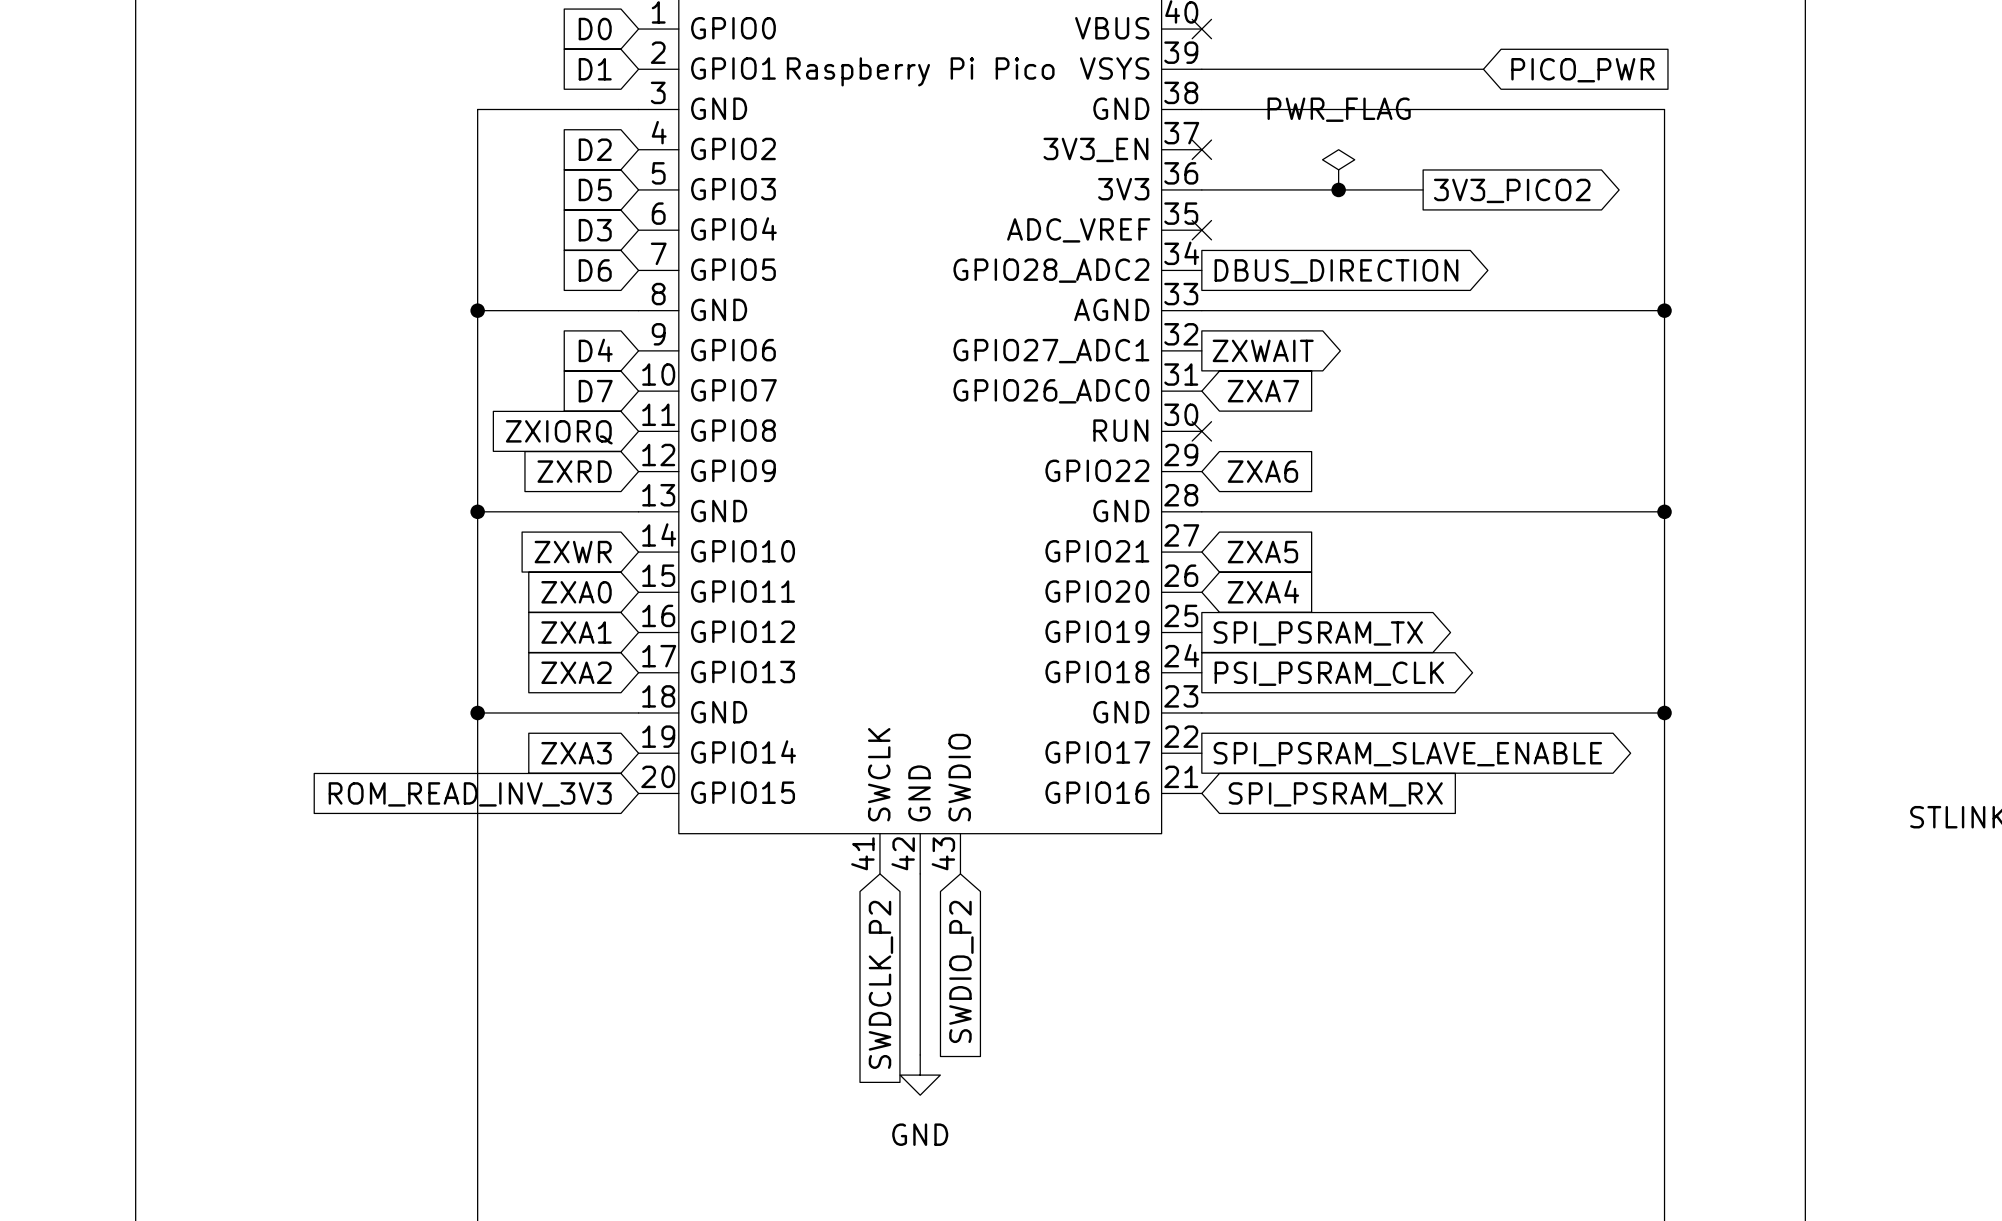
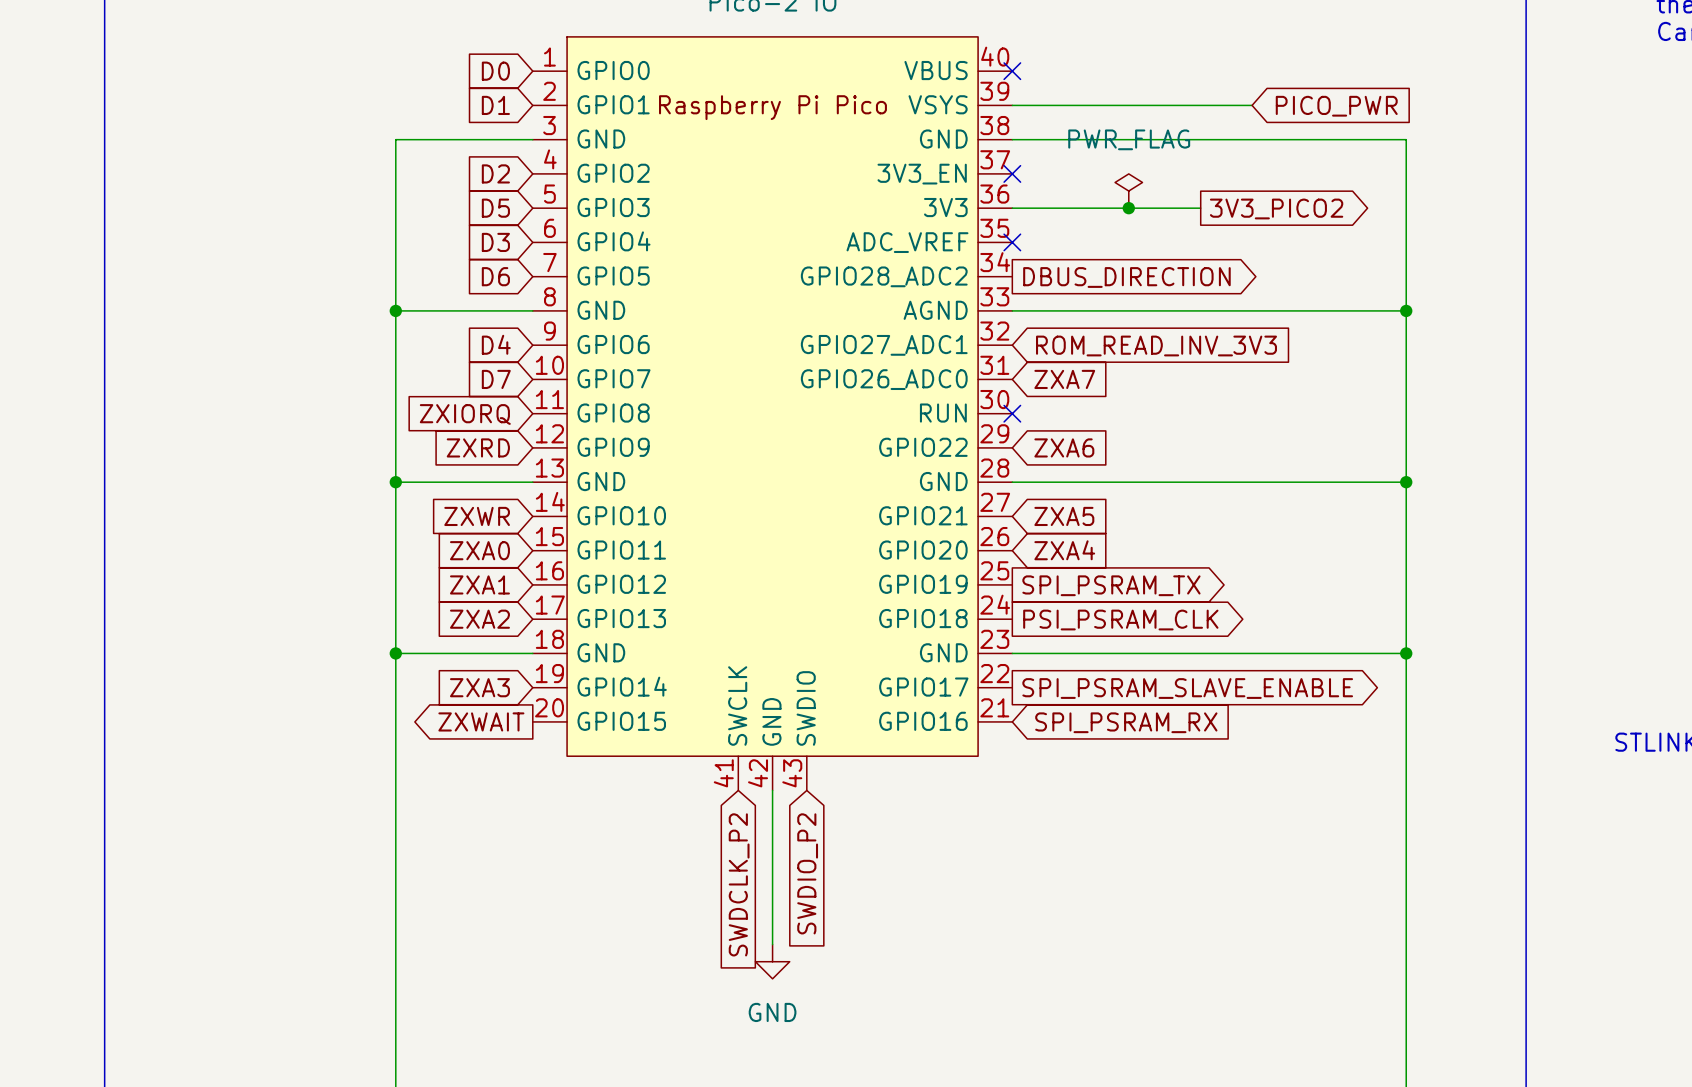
global label shape: output (1263, 350) -> input (1156, 345)
global label: ZXWAIT (1263, 350) -> ROM_READ_INV_3V3 (1156, 345)
global label shape: input (470, 794) -> output (481, 721)
global label: ROM_READ_INV_3V3 (470, 794) -> ZXWAIT (481, 721)

